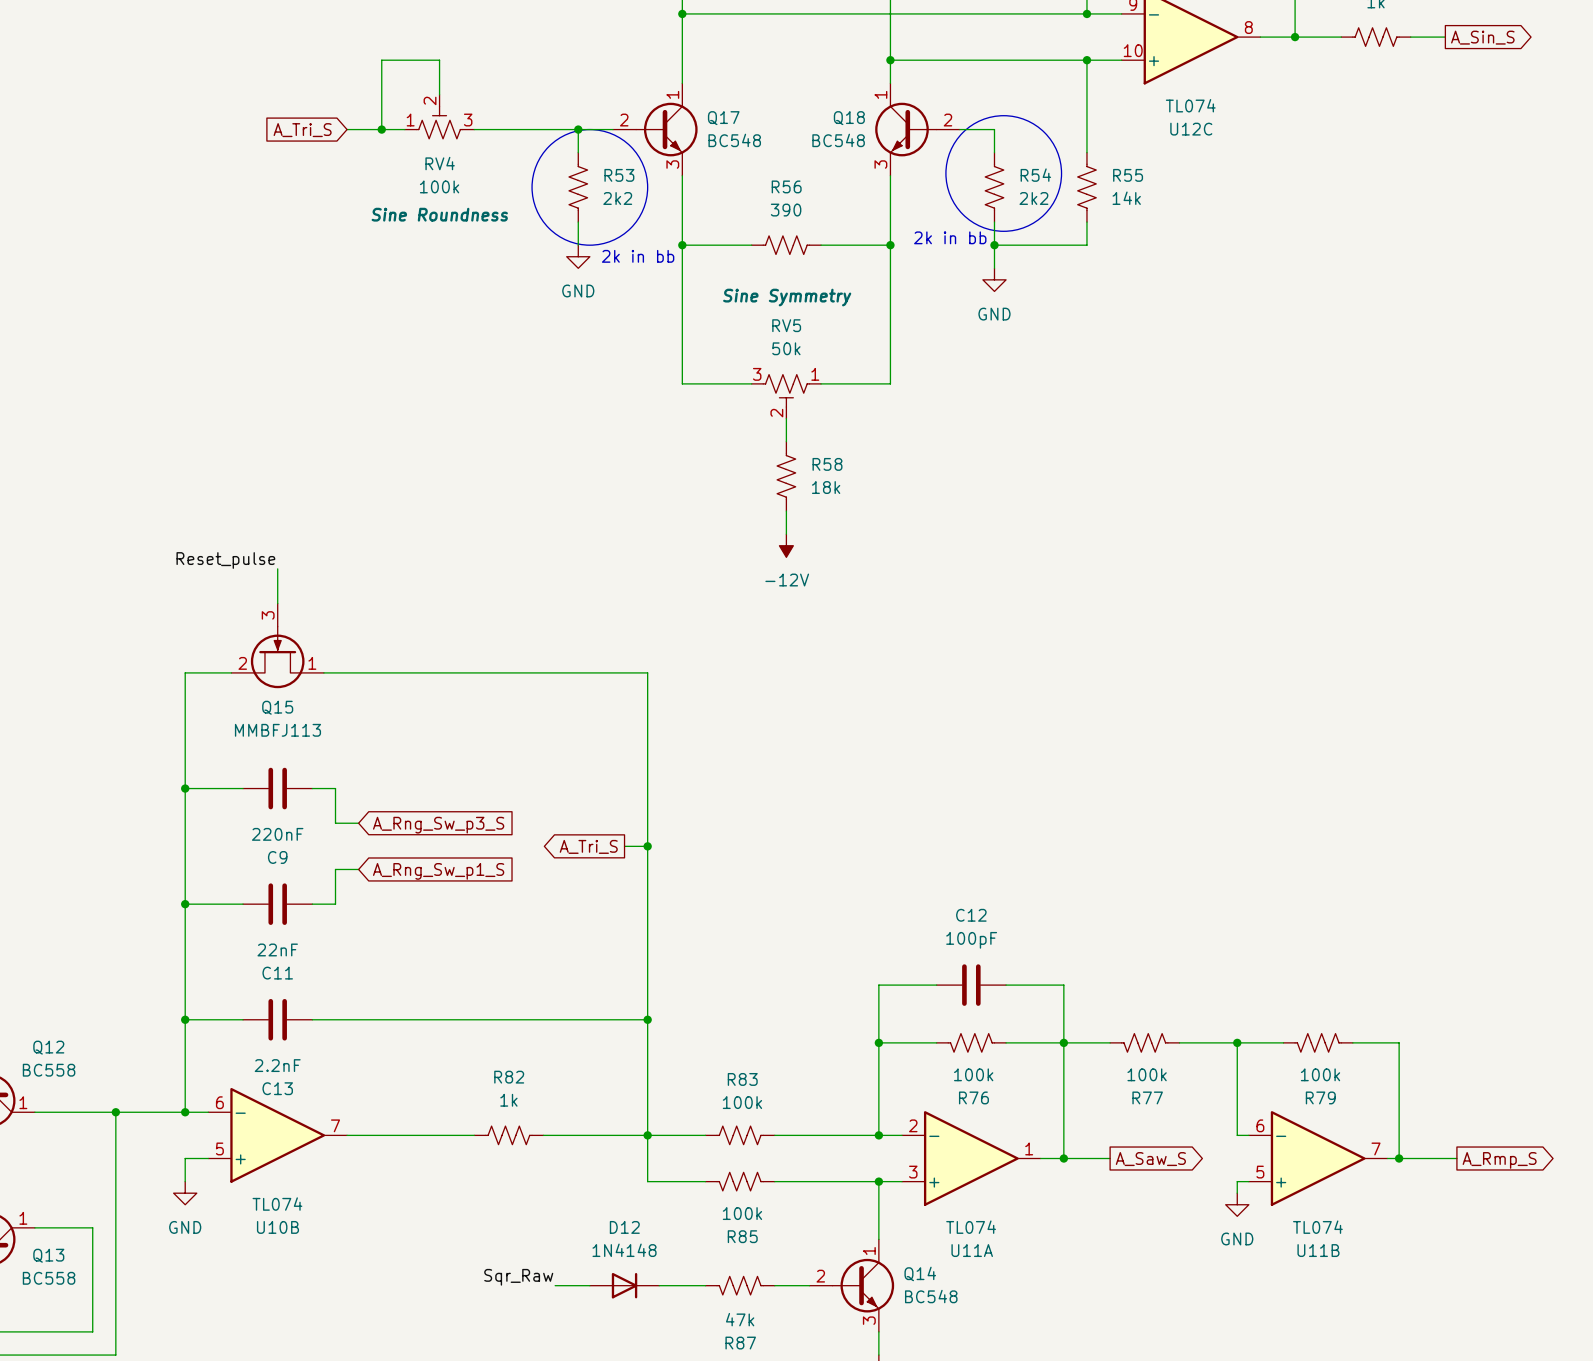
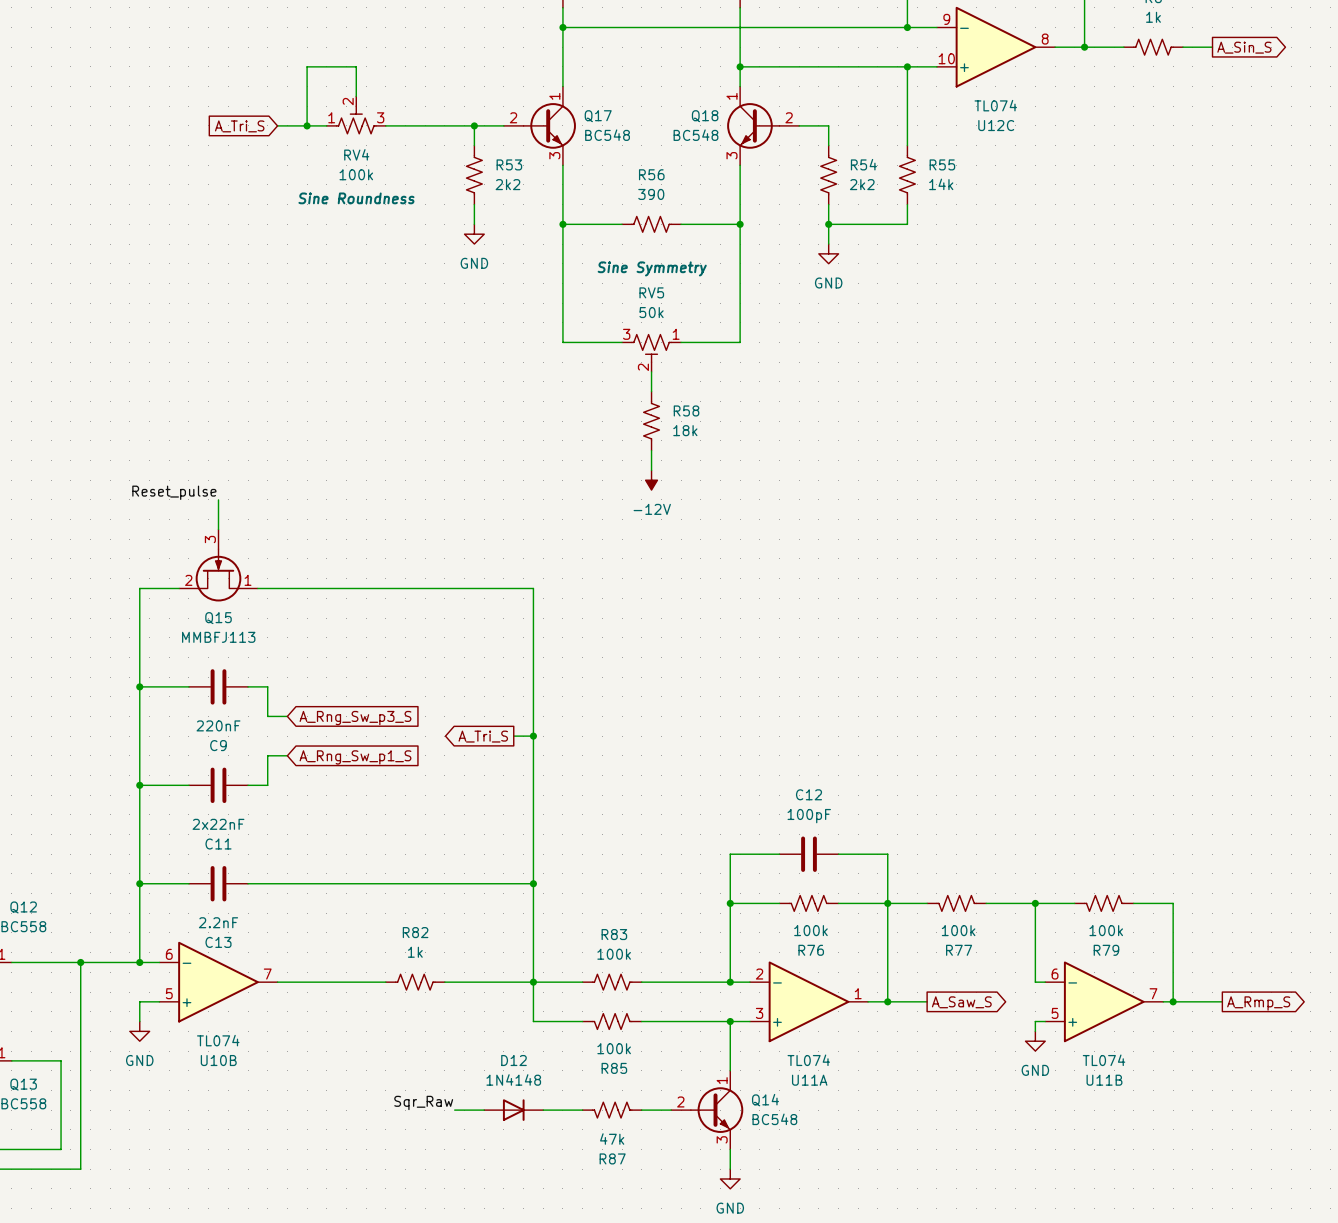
drawing: [945, 115, 1062, 232] -> none
drawing: [532, 129, 648, 246] -> none
text: 2k in bb (950, 237) -> none
text: 2k in bb (638, 256) -> none
C11 value: 22nF (277, 949) -> 2x22nF (218, 824)

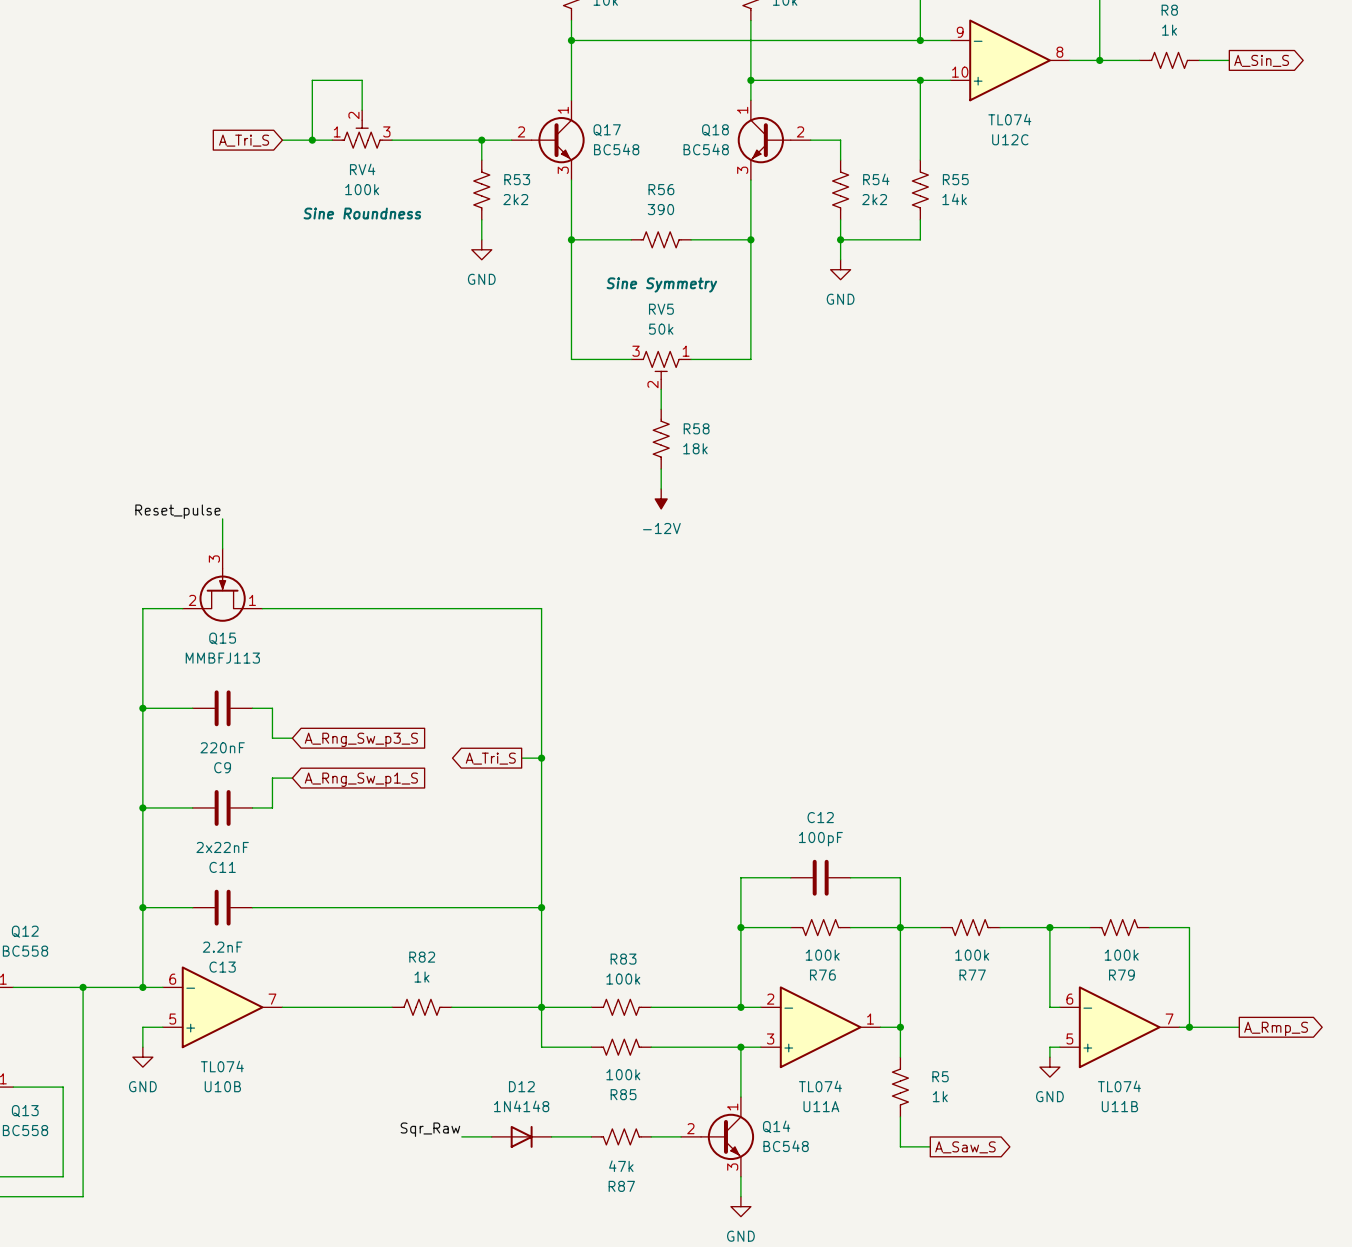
wire: (887, 1001) (927, 1001) -> (900, 1027) (900, 1057)
global label position: A_Saw_S (961, 1002) -> A_Saw_S (965, 1147)
R5: none -> 1k (900, 1087)
wire: none -> (900, 1116) (900, 1146) (930, 1146)

